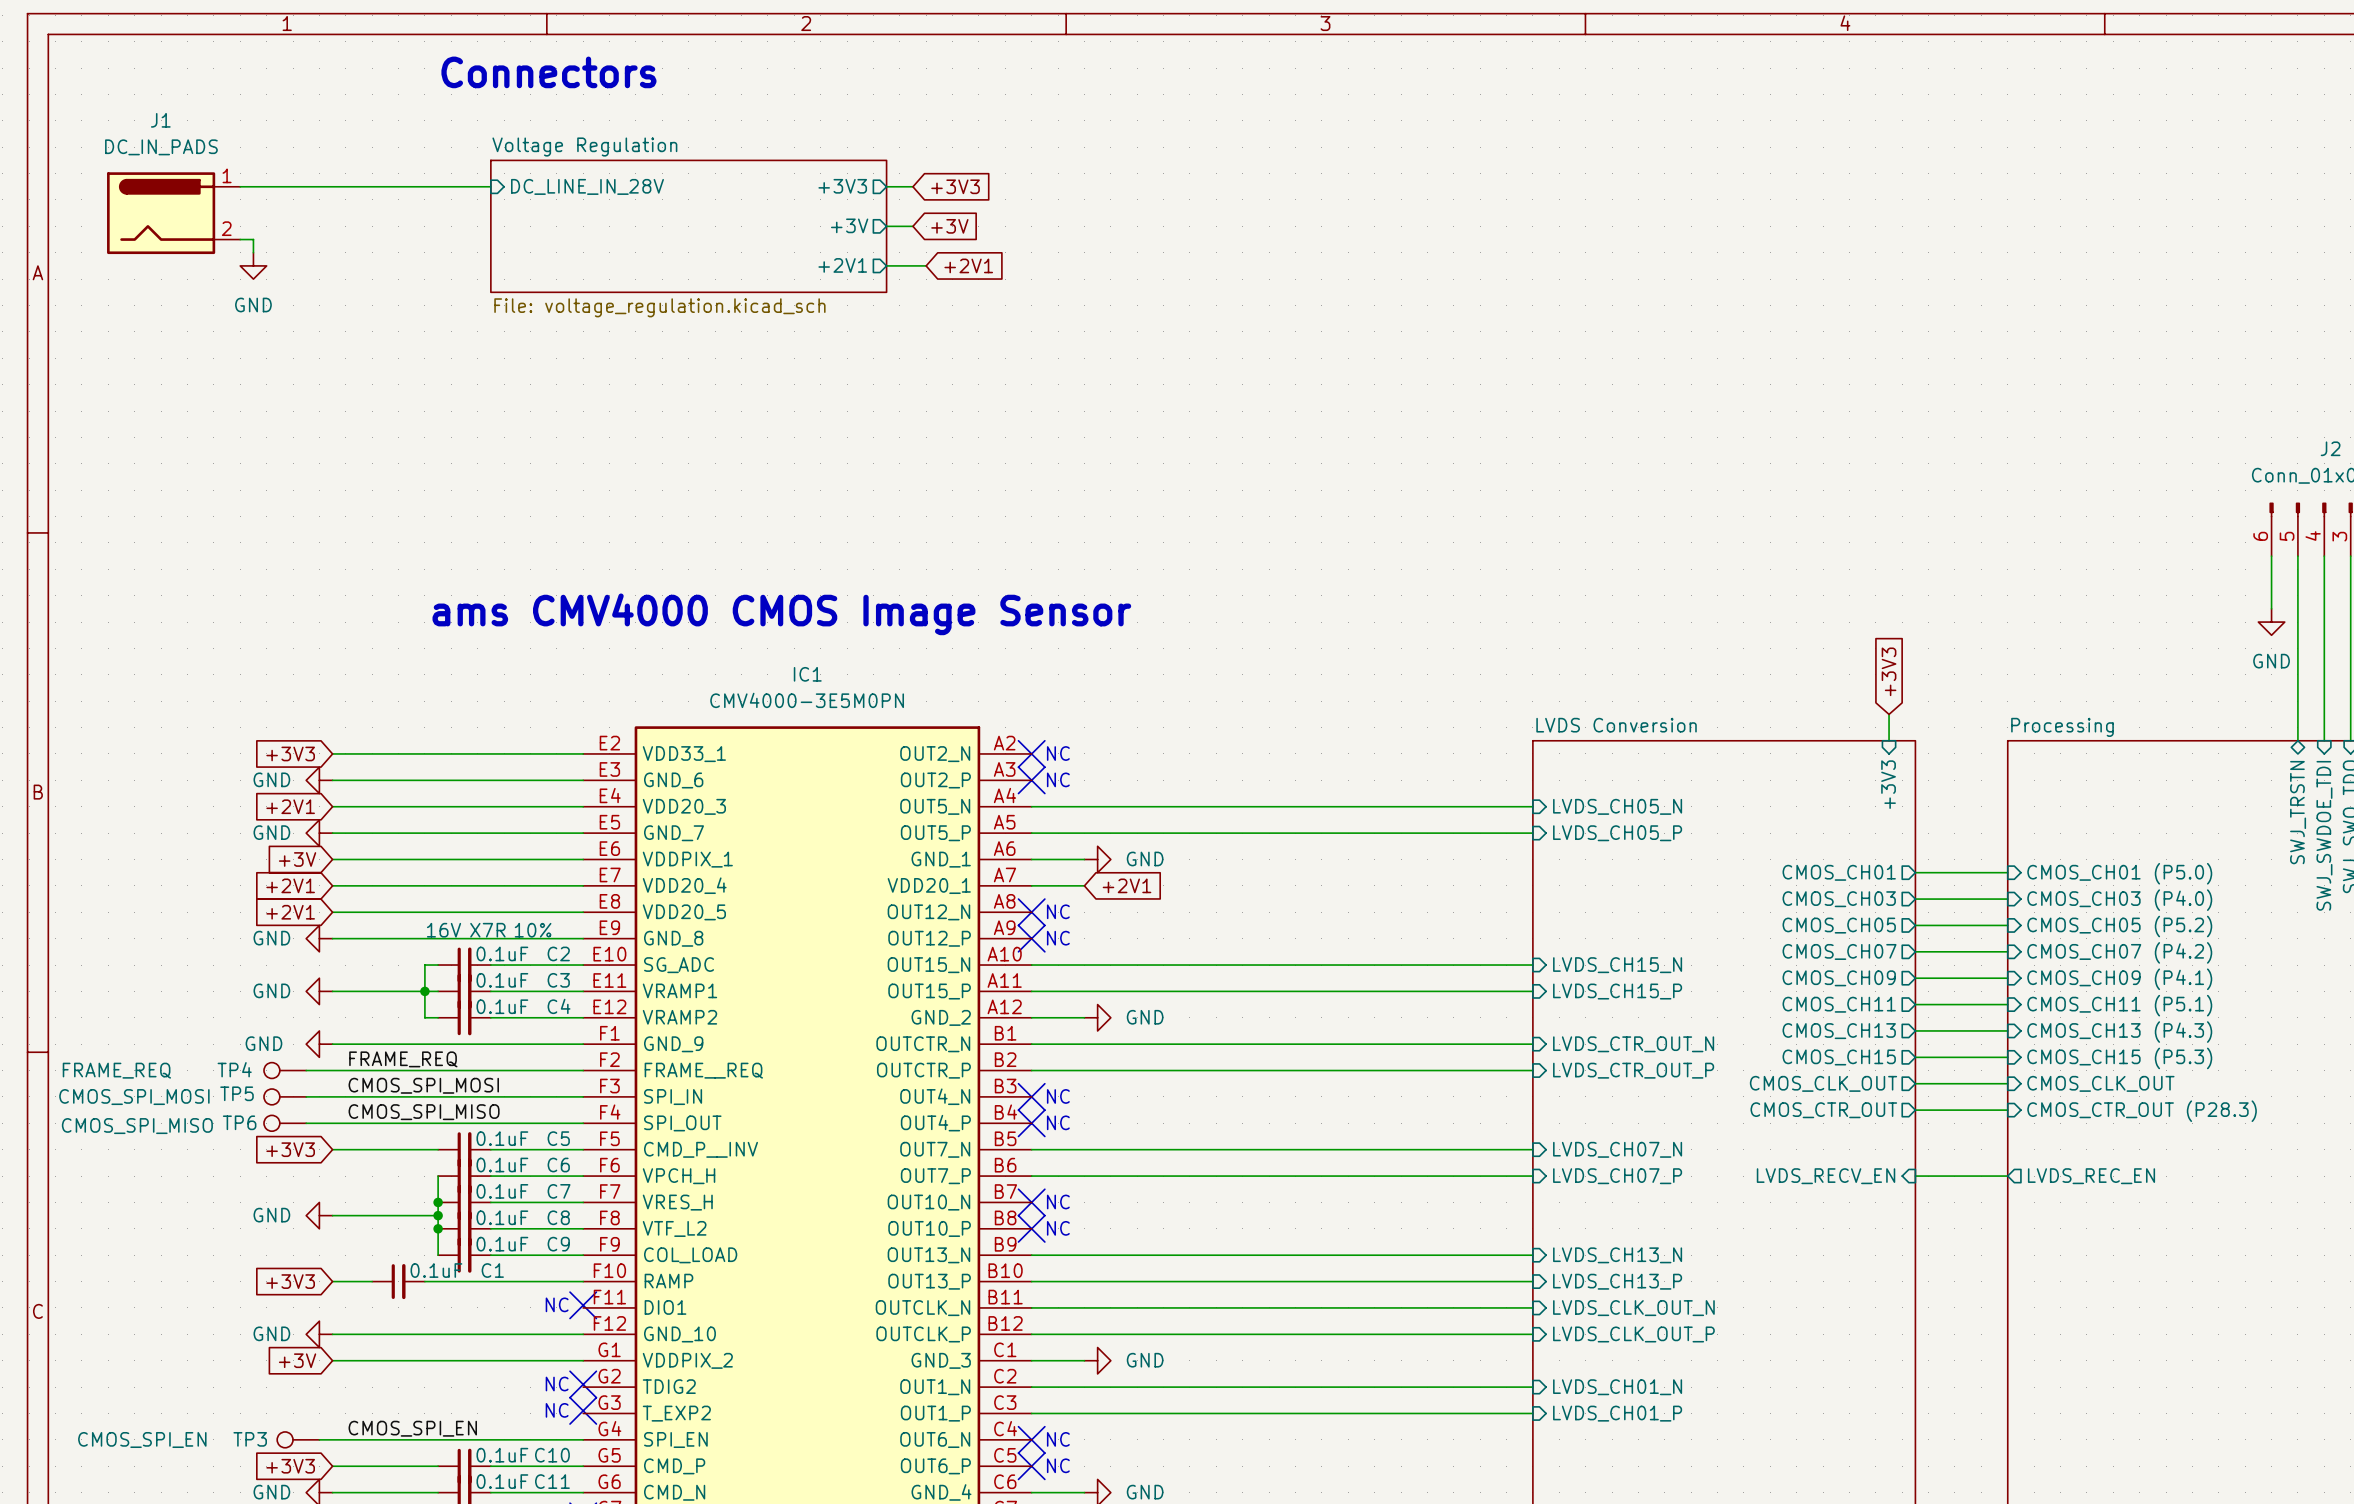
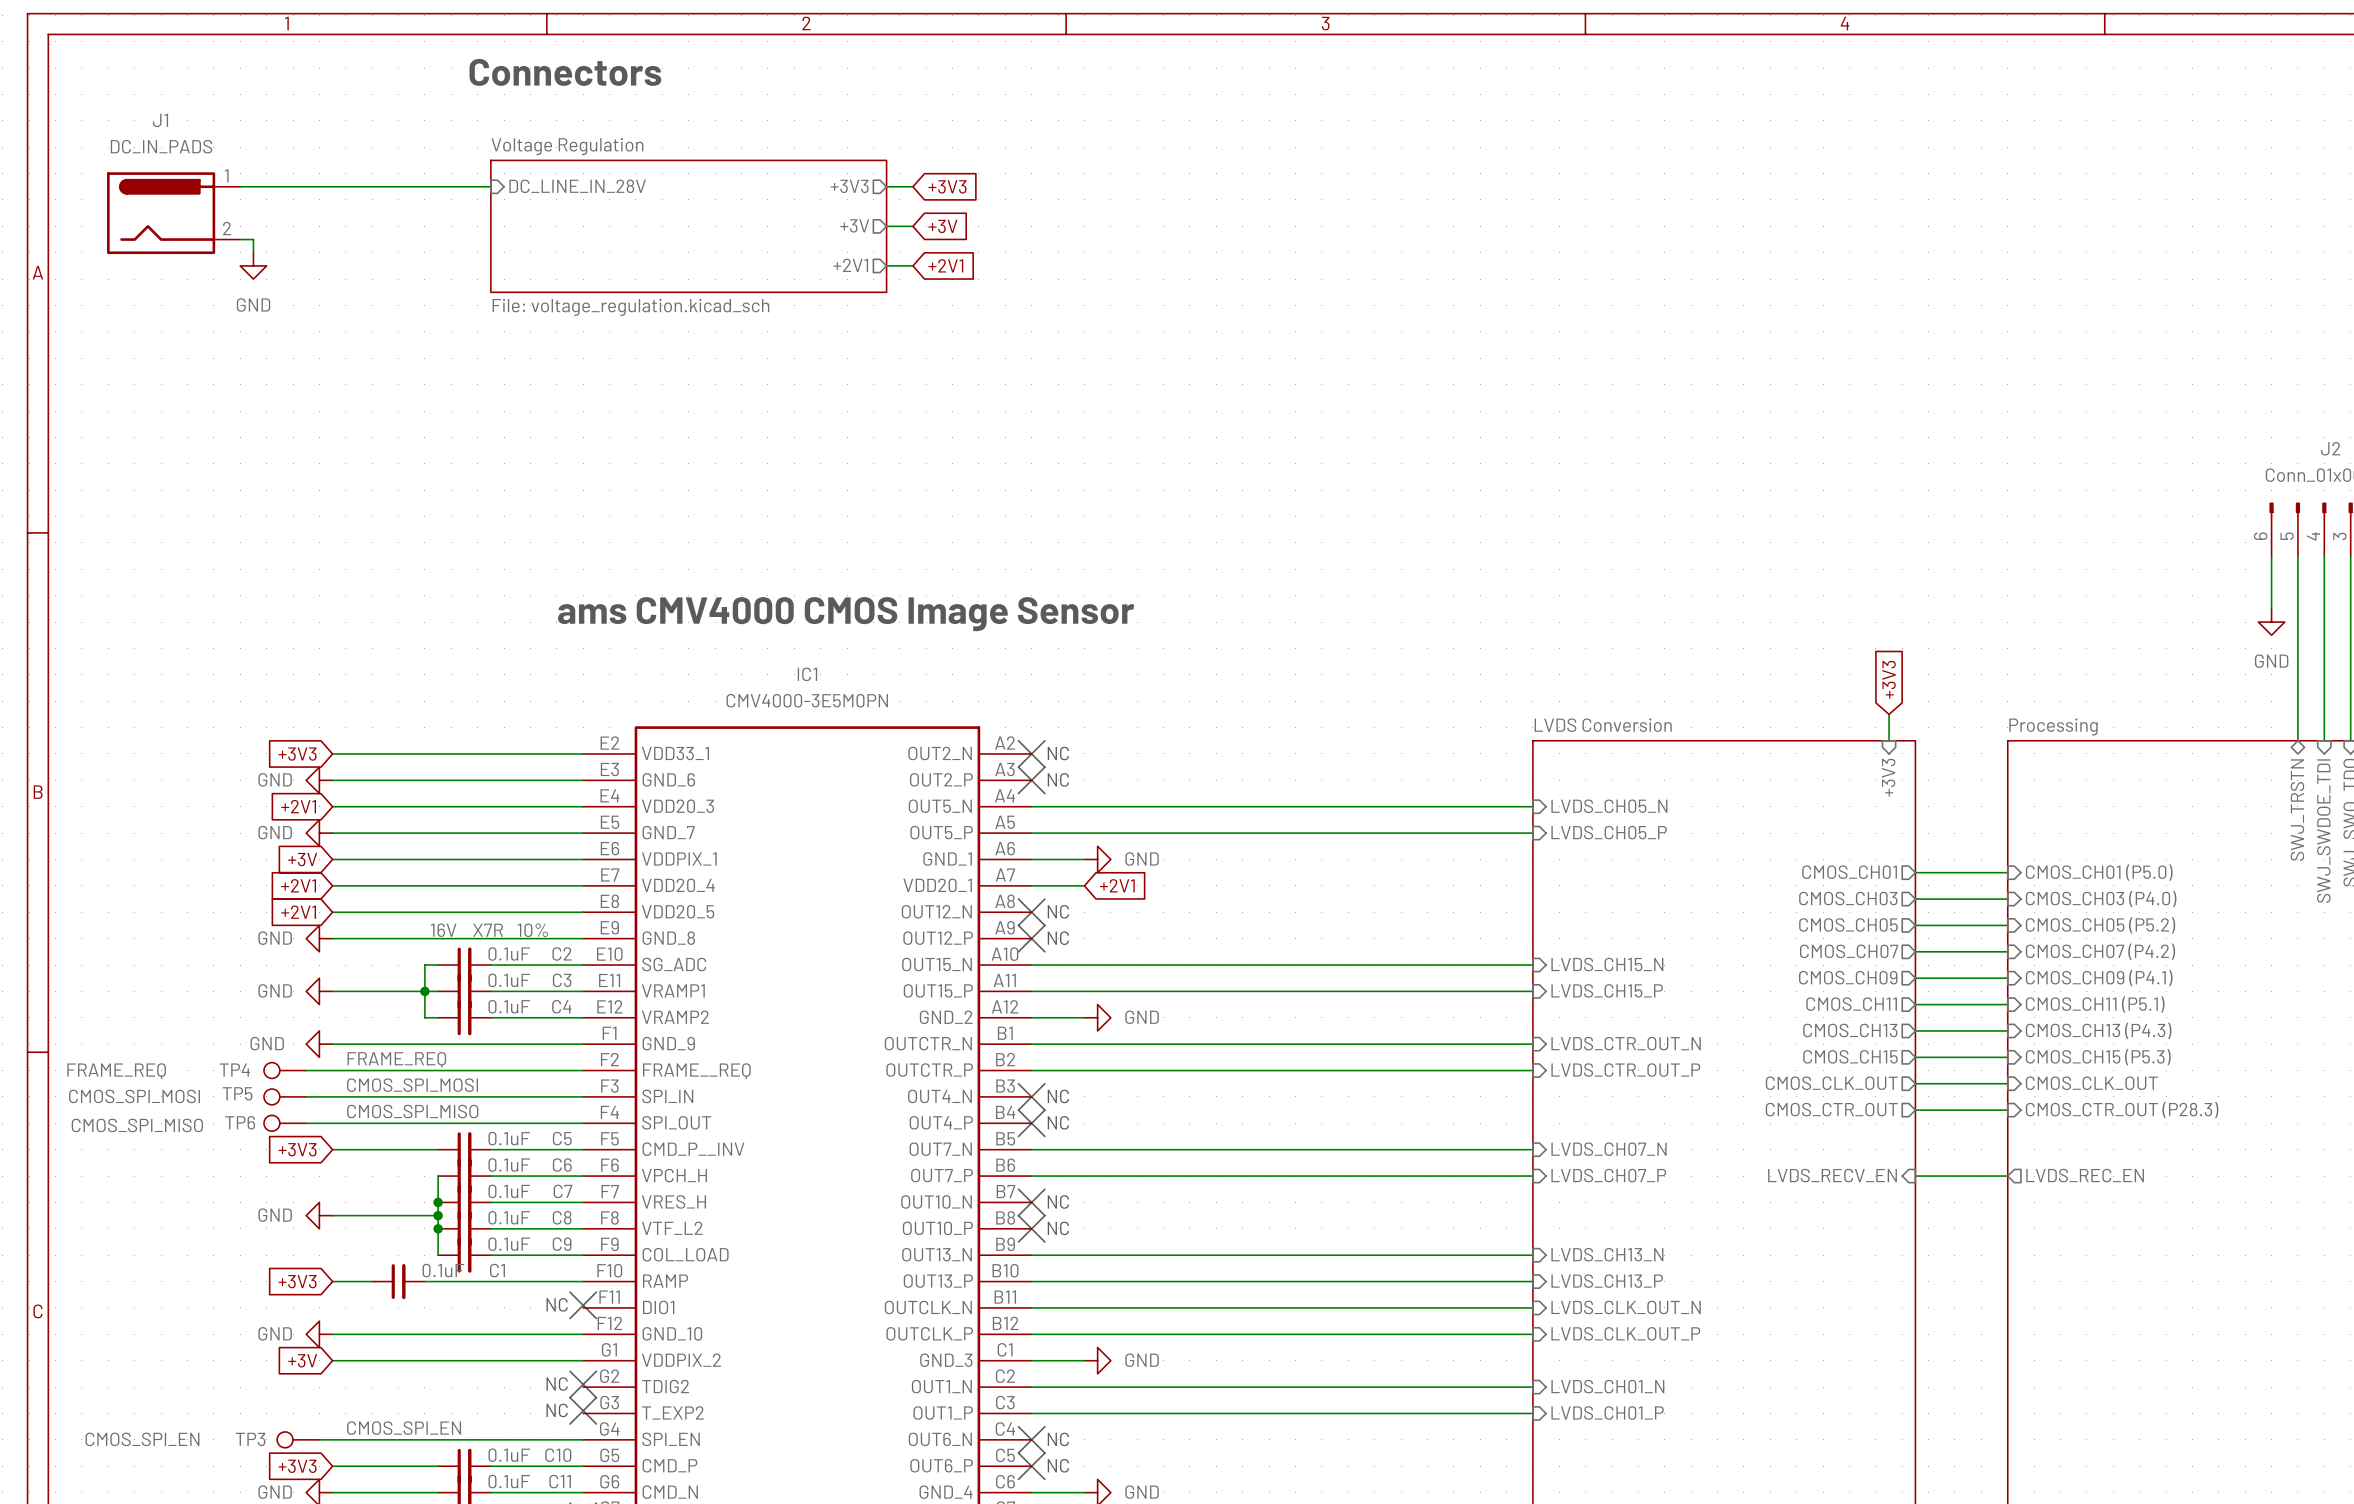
wire: (912, 265) (926, 265) -> none
global label position: +2V1 (968, 265) -> +2V1 (945, 265)

